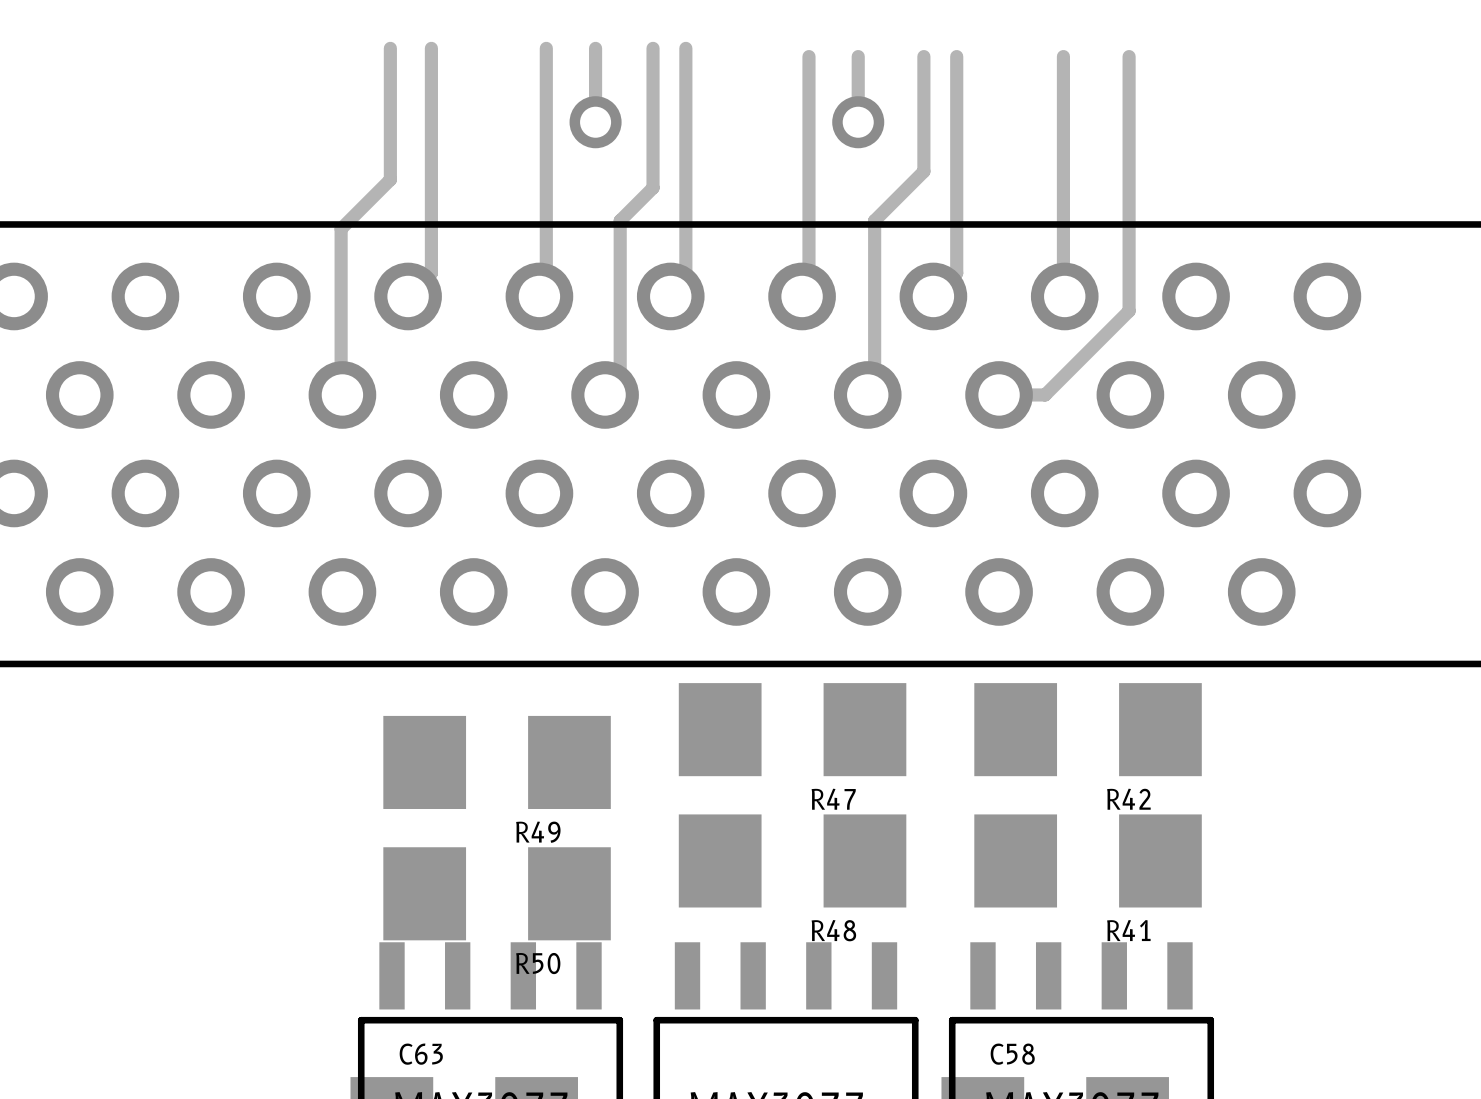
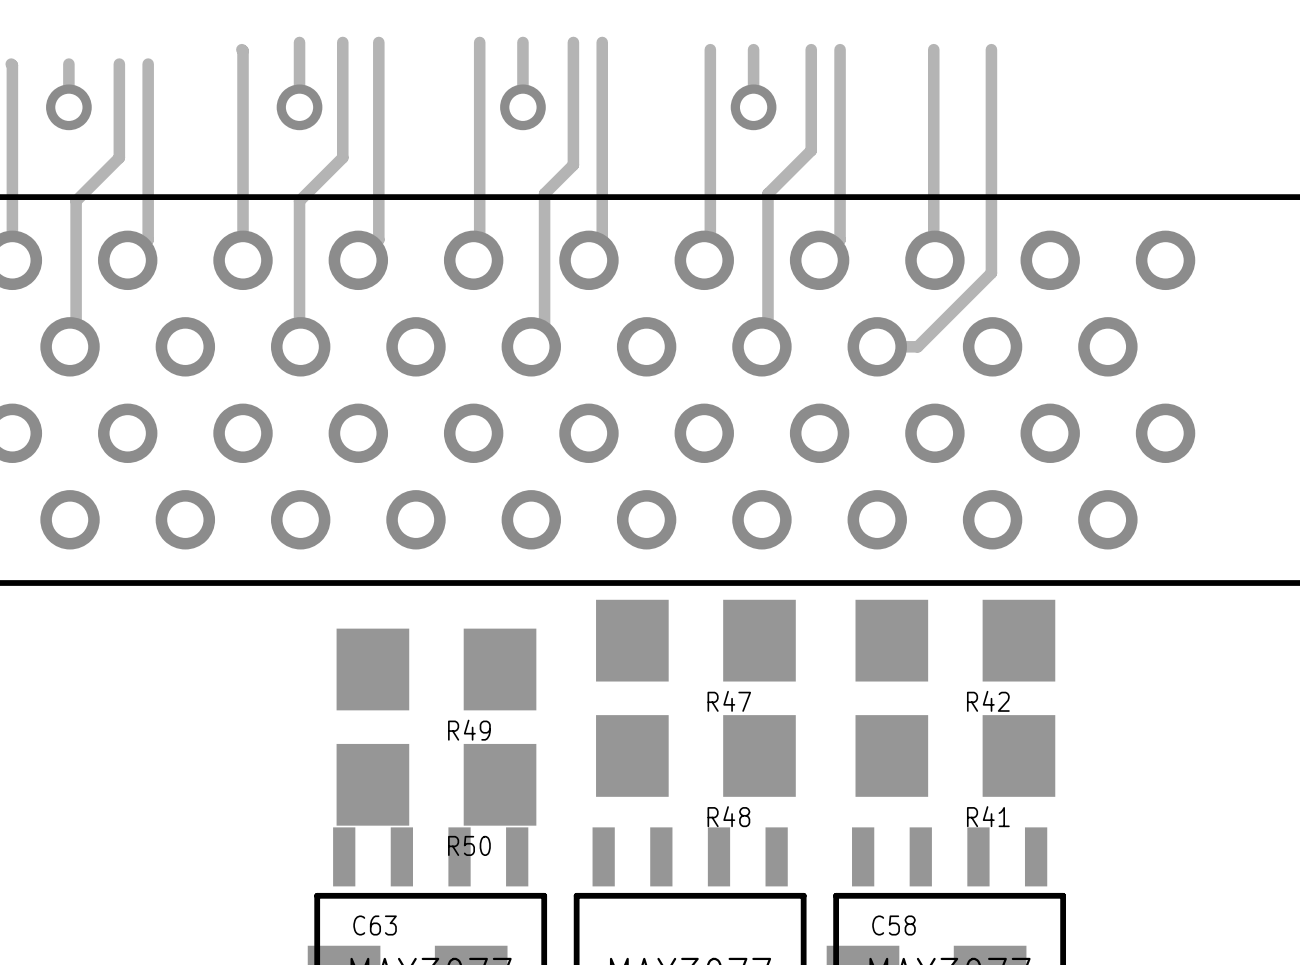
track: none -> (299, 42) (299, 107)
track: none -> (241, 49) (243, 260)
track: none -> (11, 64) (12, 260)
track: none -> (68, 64) (68, 107)
track: none -> (119, 64) (119, 157) (76, 201) (76, 340) (70, 346)
track: none -> (148, 64) (148, 239) (127, 260)
via: none -> (68, 107)
via: none -> (299, 107)

